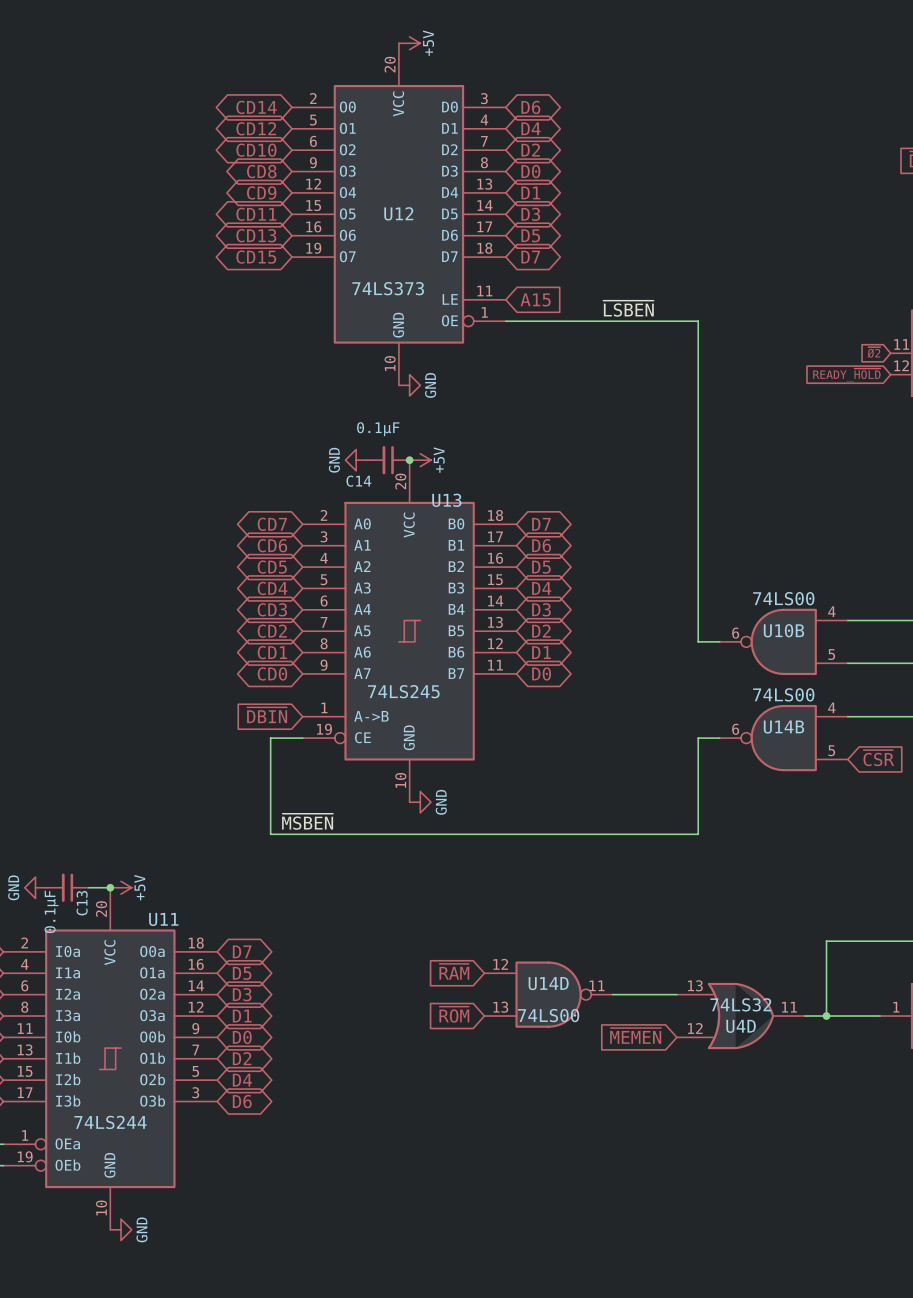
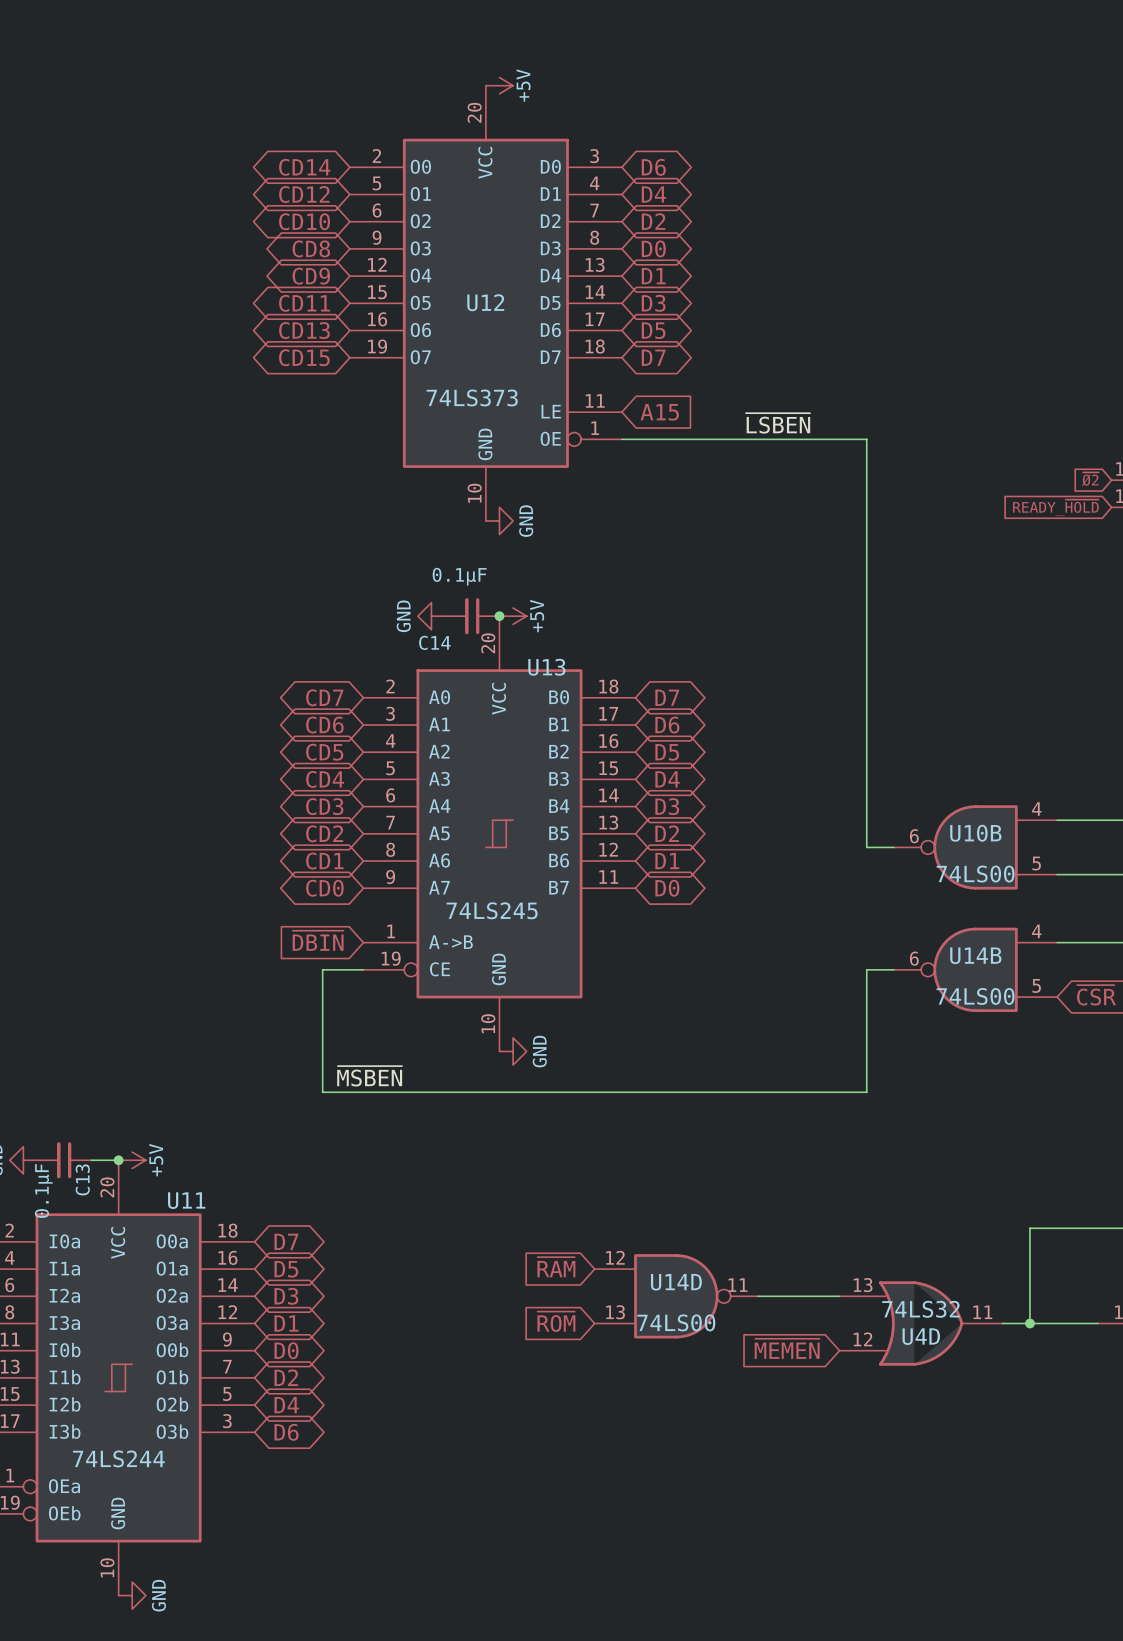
U10B value position: 74LS00 (783, 598) -> 74LS00 (975, 874)
U14B value position: 74LS00 (783, 694) -> 74LS00 (975, 996)

